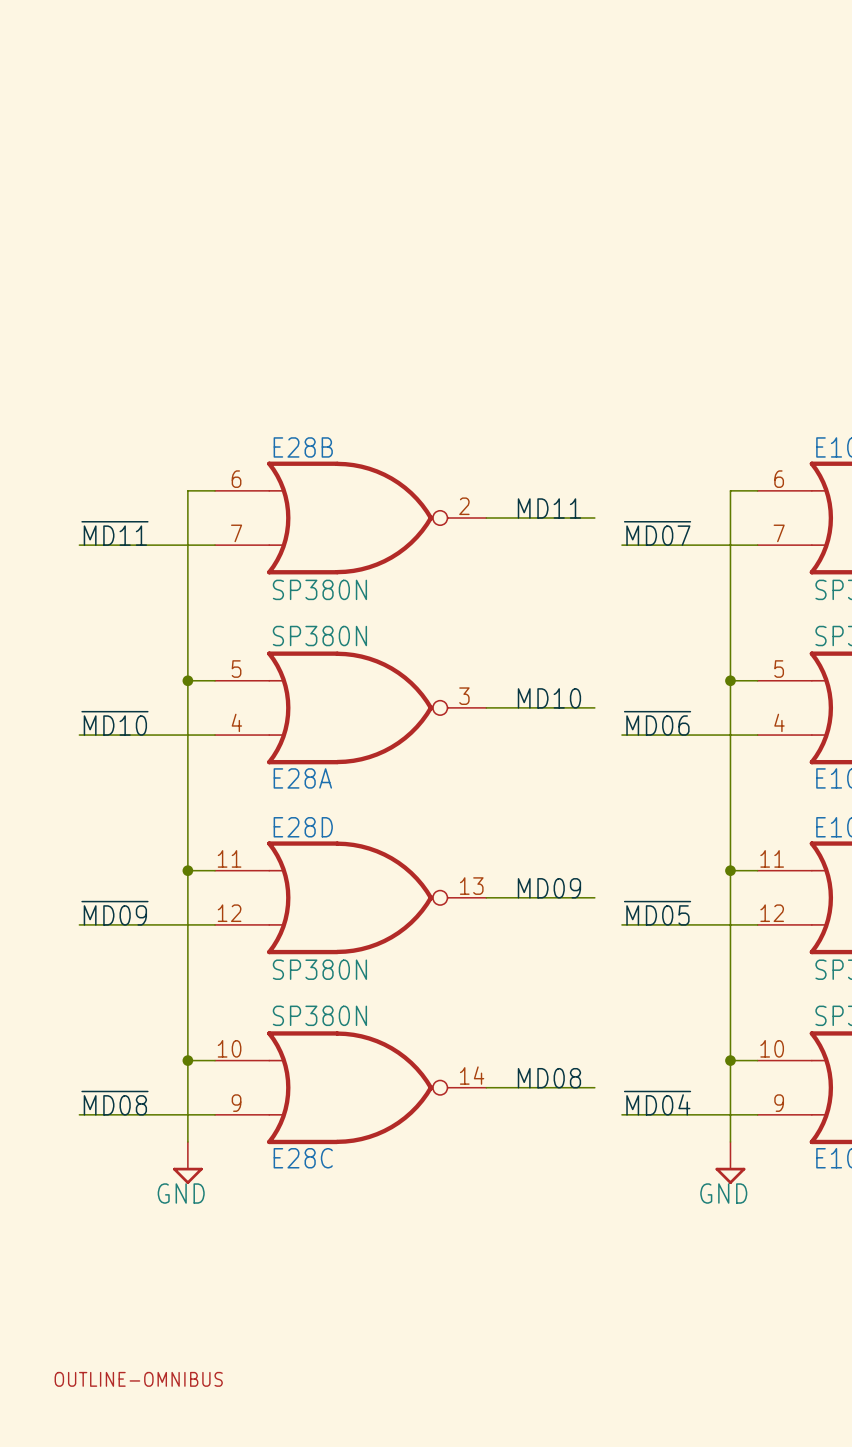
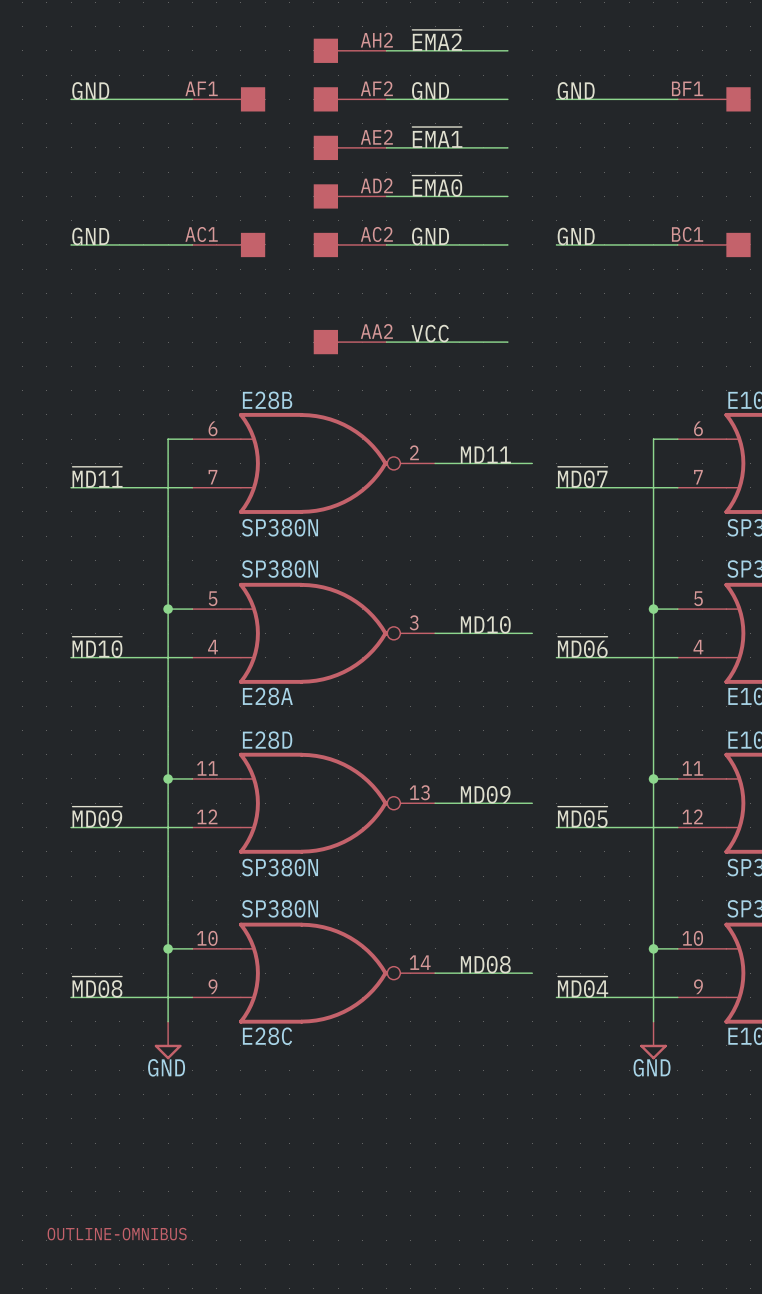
label: none -> ~{EMA2} (437, 40)
part: none -> (350, 50)
wire: none -> (386, 50) (507, 50)
label: none -> GND (90, 90)
label: none -> GND (430, 90)
label: none -> GND (576, 90)
wire: none -> (71, 99) (192, 99)
part: none -> (228, 99)
part: none -> (350, 99)
wire: none -> (386, 99) (507, 99)
wire: none -> (556, 99) (677, 99)
part: none -> (714, 99)
label: none -> ~{EMA1} (437, 137)
part: none -> (350, 147)
wire: none -> (386, 147) (507, 147)
label: none -> ~{EMA0} (437, 186)
part: none -> (350, 196)
wire: none -> (386, 196) (507, 196)
label: none -> GND (90, 236)
label: none -> GND (430, 236)
label: none -> GND (576, 236)
wire: none -> (71, 244) (192, 244)
part: none -> (228, 244)
part: none -> (350, 244)
wire: none -> (386, 244) (507, 244)
wire: none -> (556, 244) (677, 244)
part: none -> (714, 244)
label: none -> VCC (430, 333)
part: none -> (350, 342)
wire: none -> (386, 342) (507, 342)

